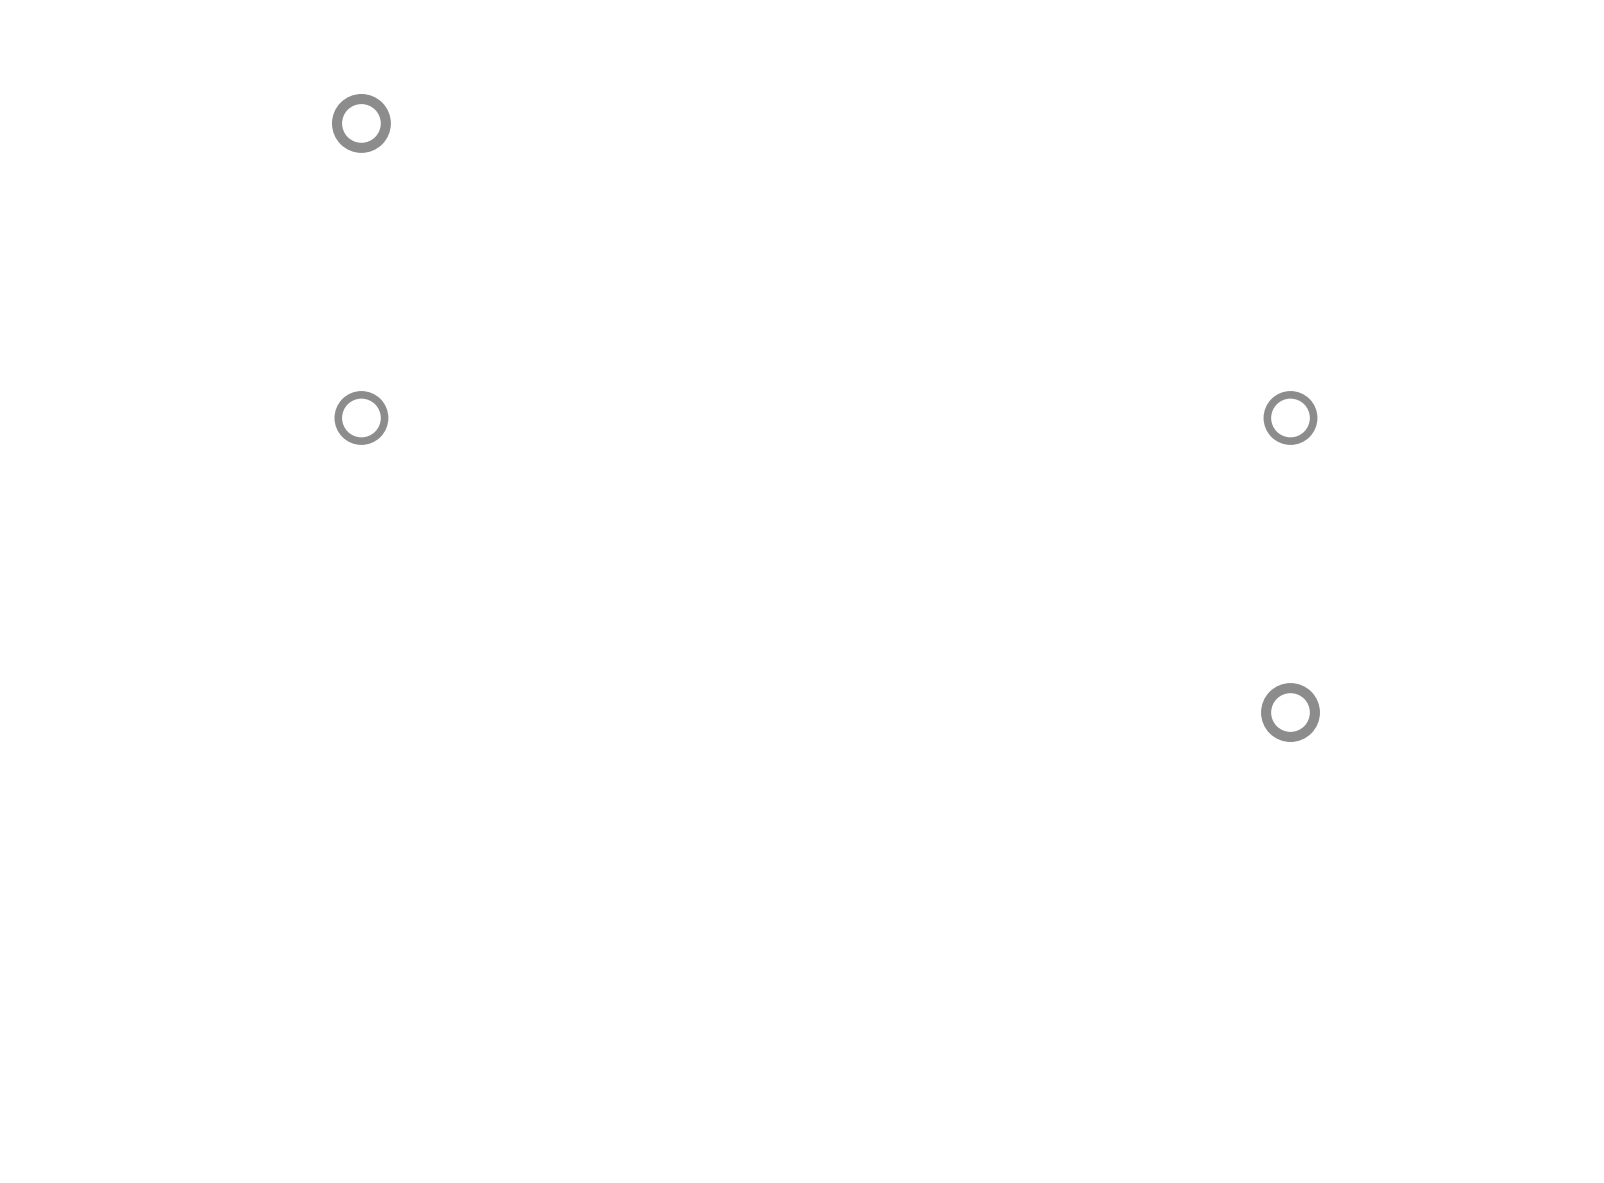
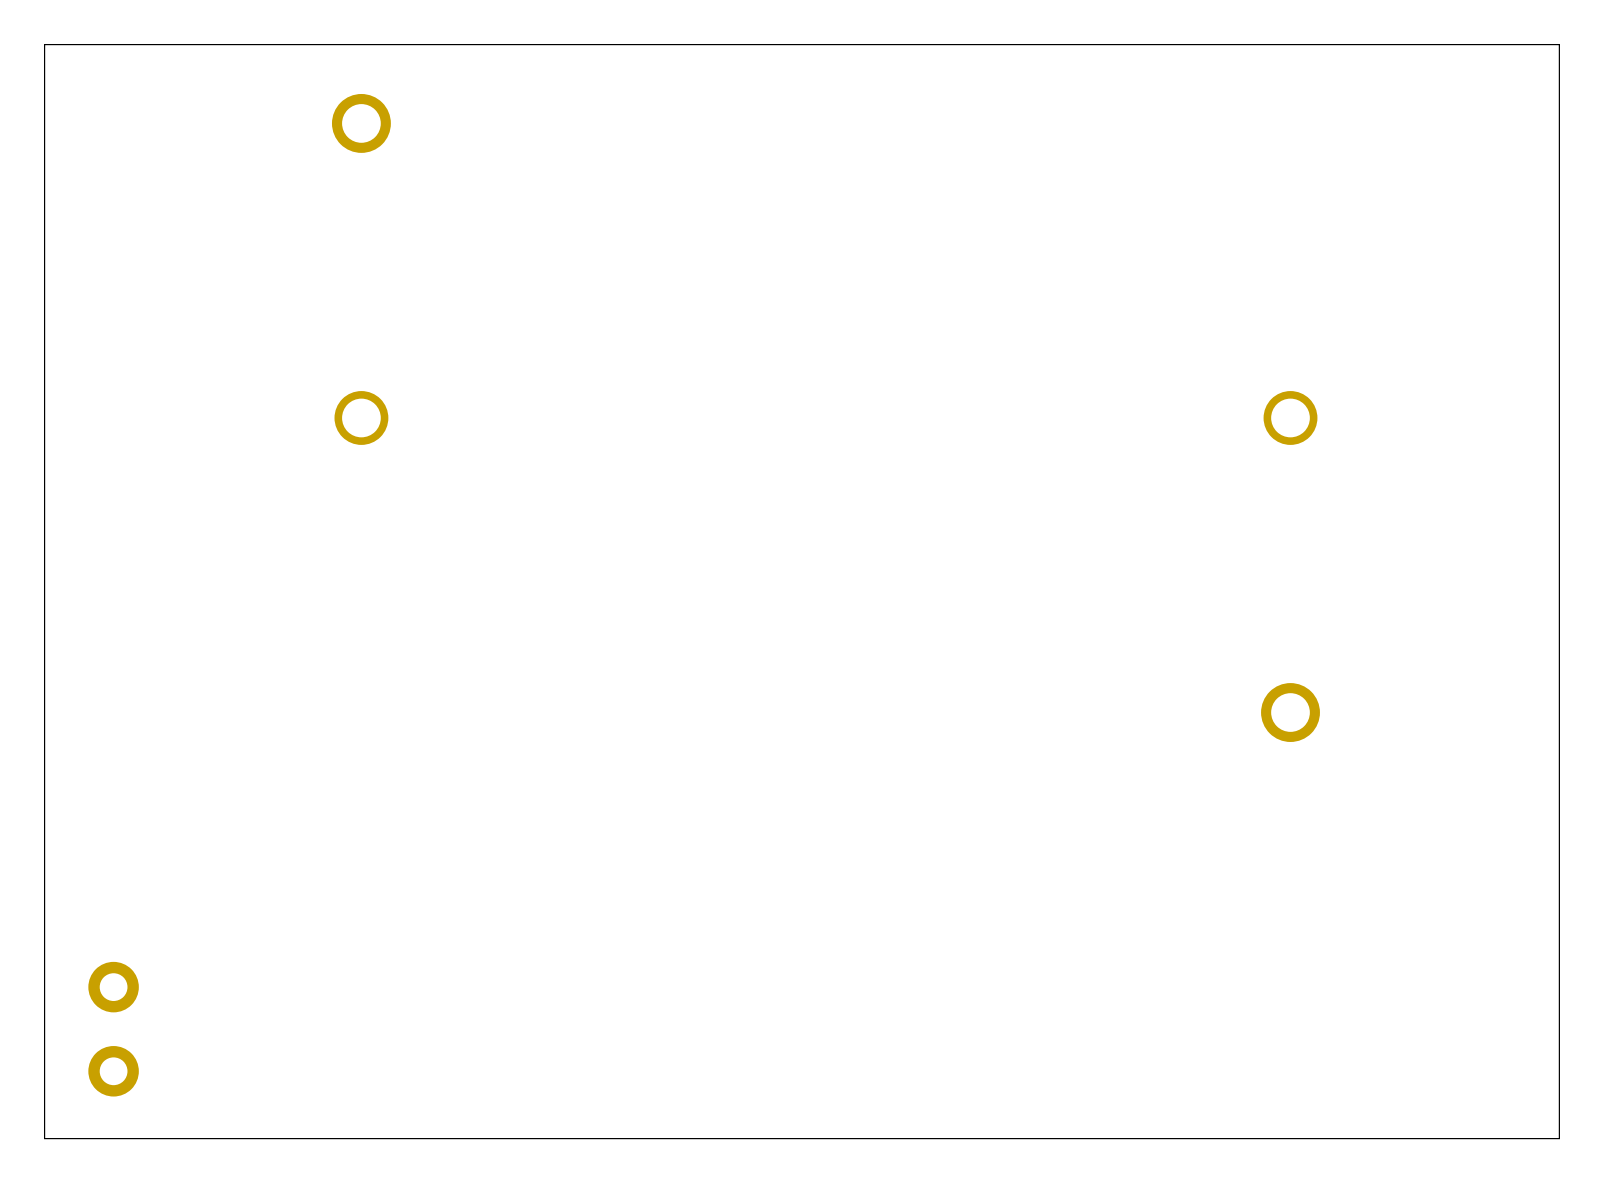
board edge: none -> (1559, 44) (1559, 1138) (44, 1138) (44, 44) (1559, 44)
part: none -> (113, 1029)

